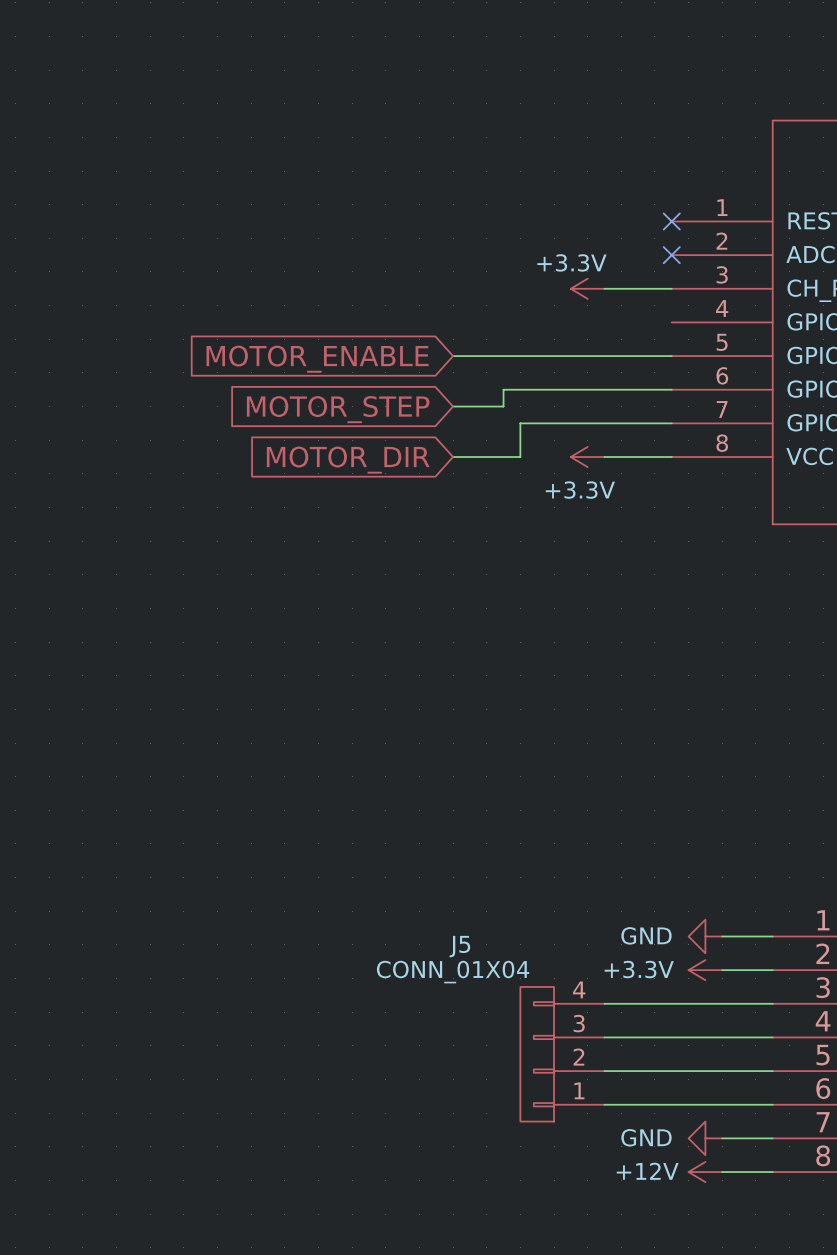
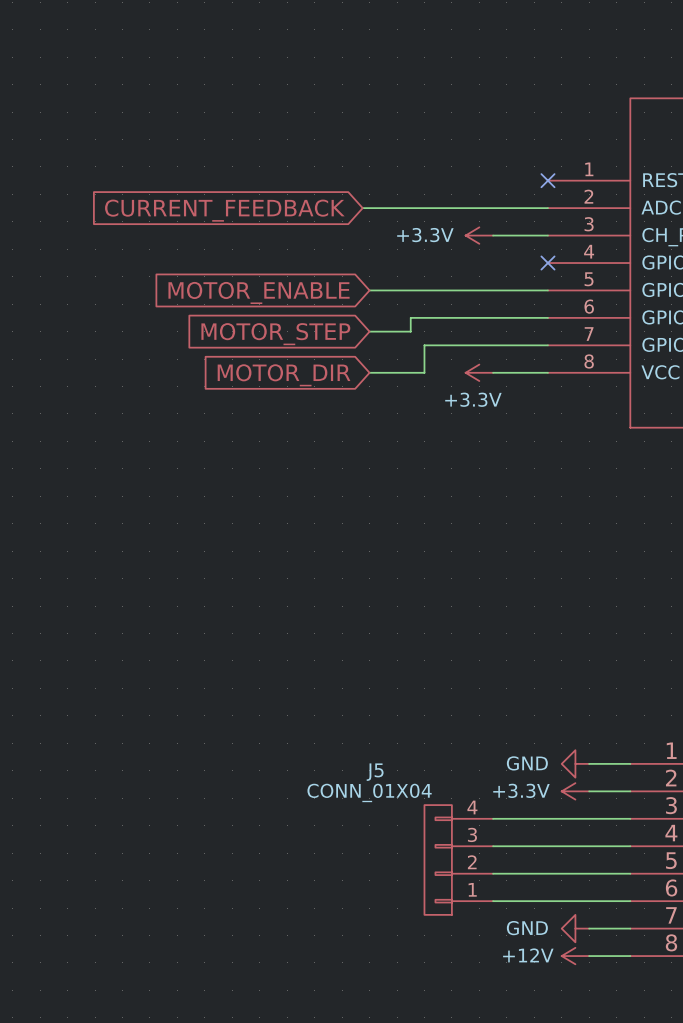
wire: none -> (362, 208) (547, 208)
no-connect mark position: (671, 255) -> (547, 263)
global label: none -> CURRENT_FEEDBACK (224, 210)
power symbol text position: +3.3V (571, 262) -> +3.3V (425, 235)

